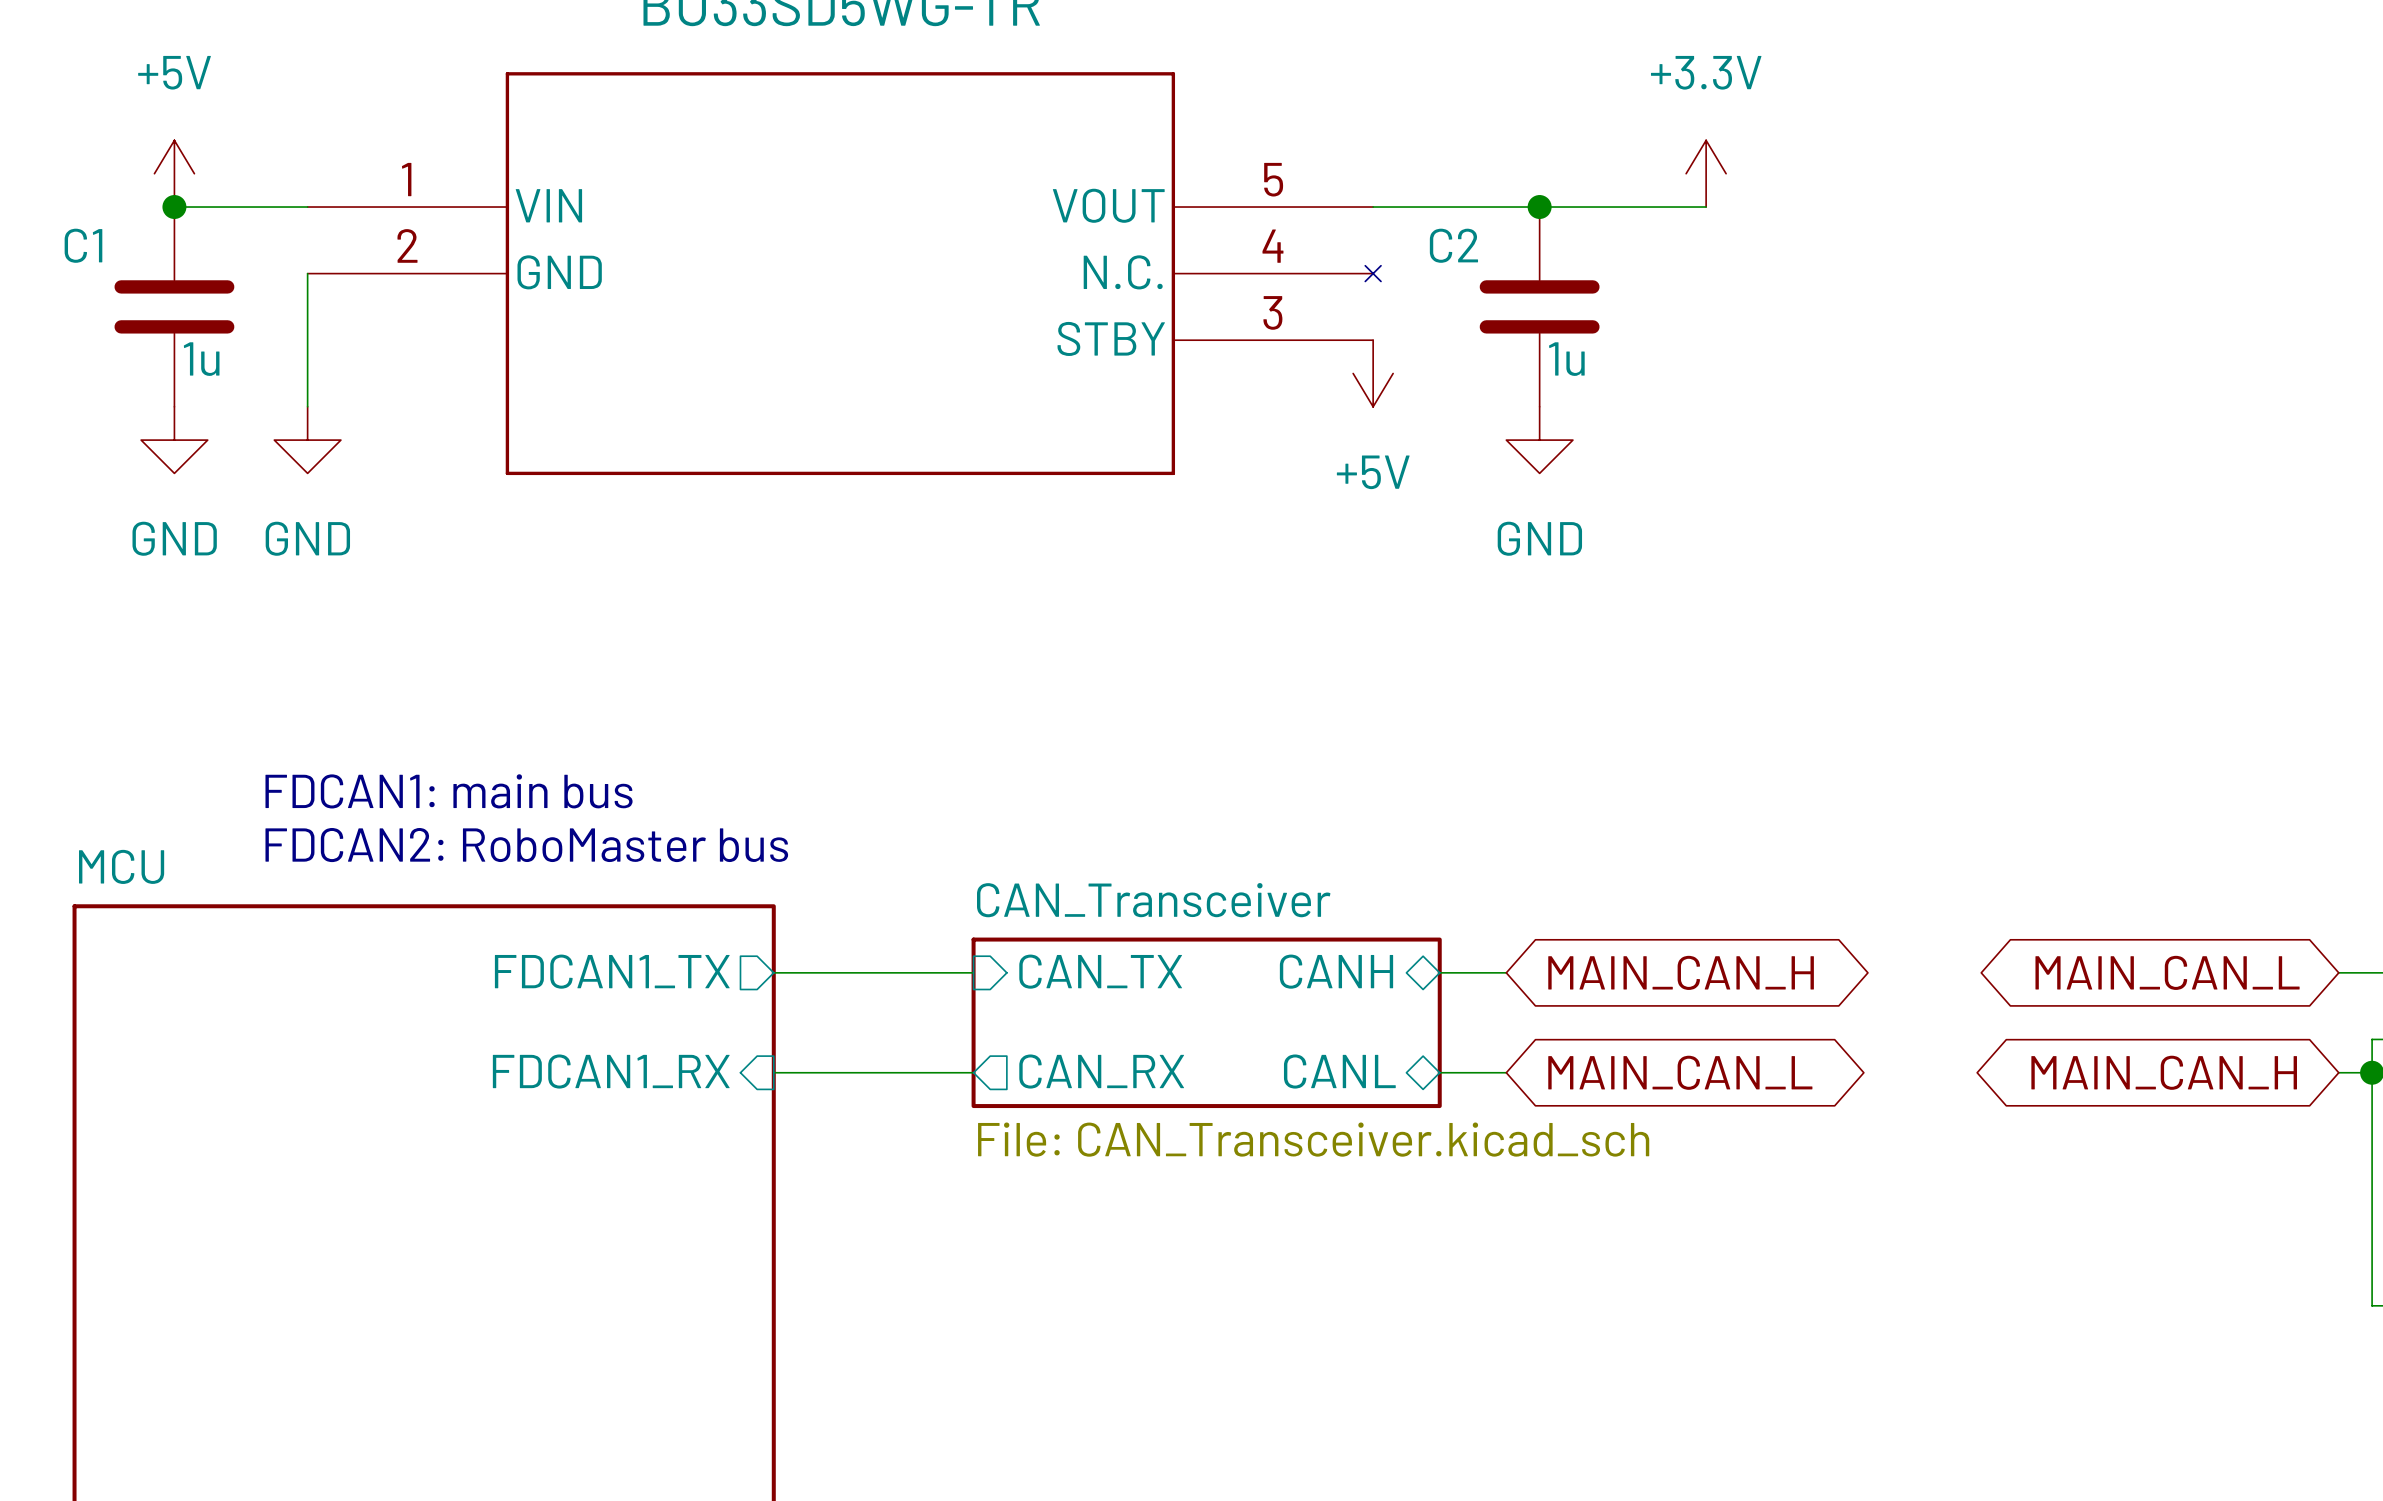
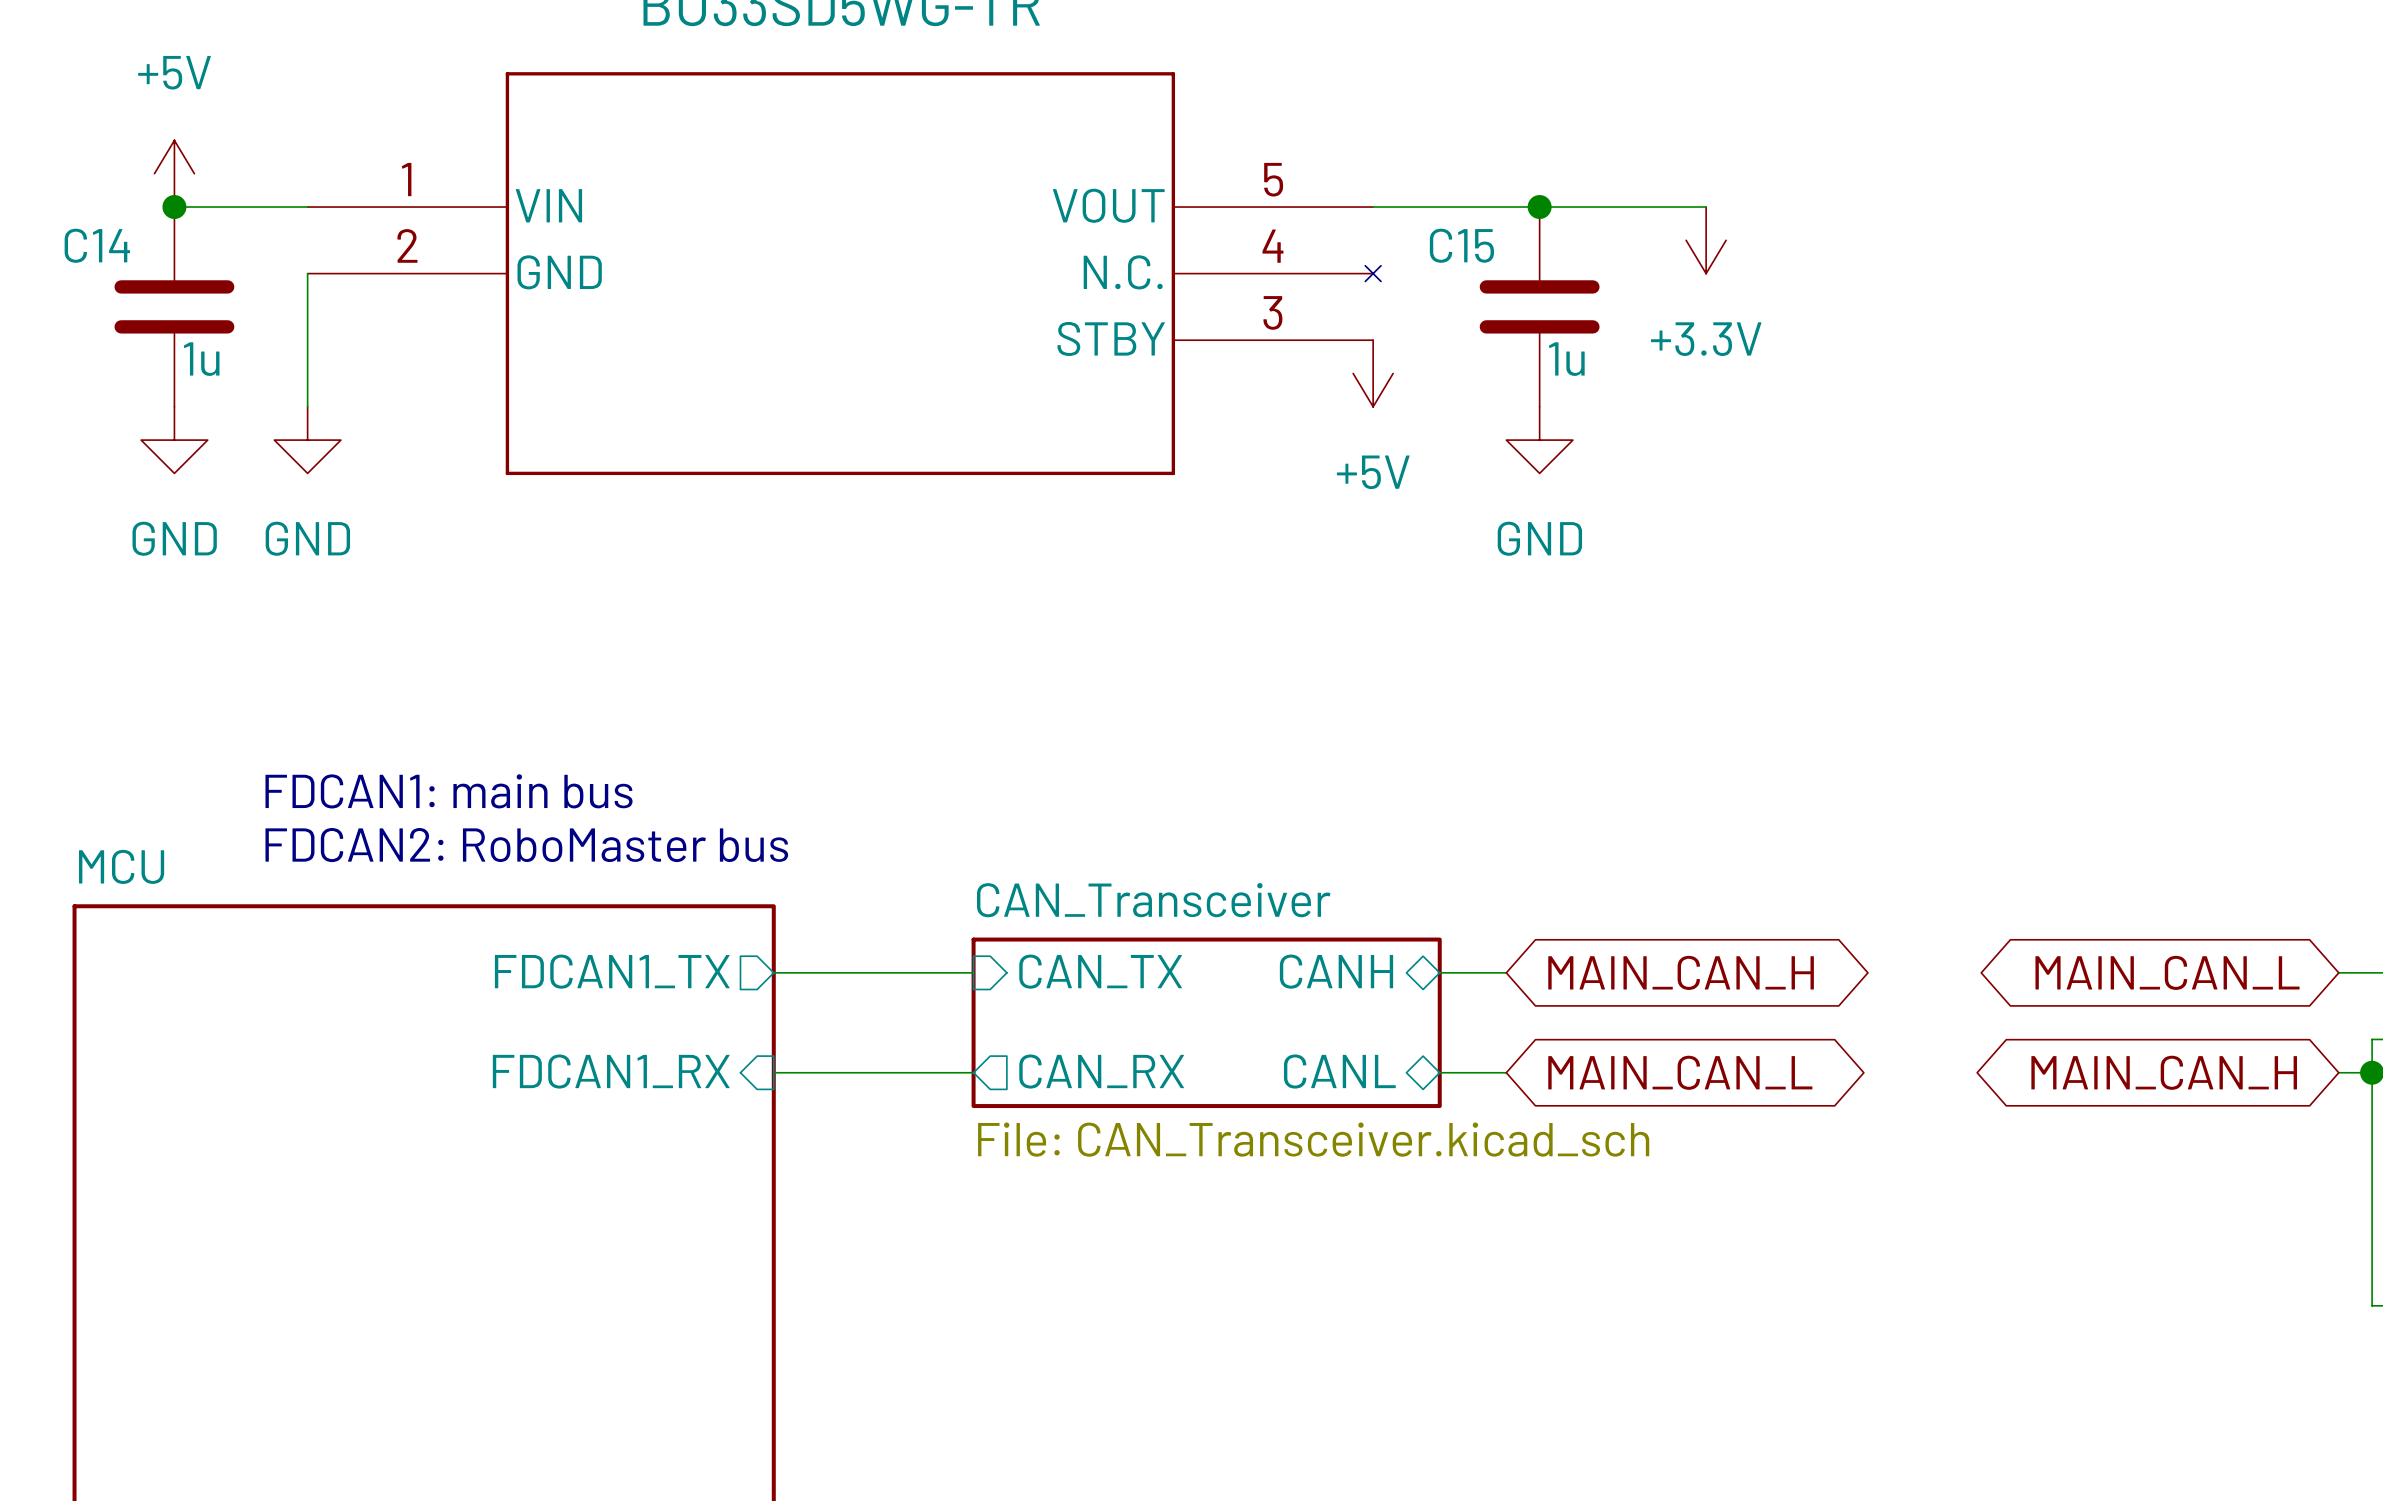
power symbol rotation: 0° (1706, 173) -> 180° (1706, 240)
power symbol position: +3.3V (1706, 173) -> +3.3V (1706, 240)
C1 name: C1 (83, 245) -> C14 (97, 245)
C2 name: C2 (1453, 245) -> C15 (1461, 245)

